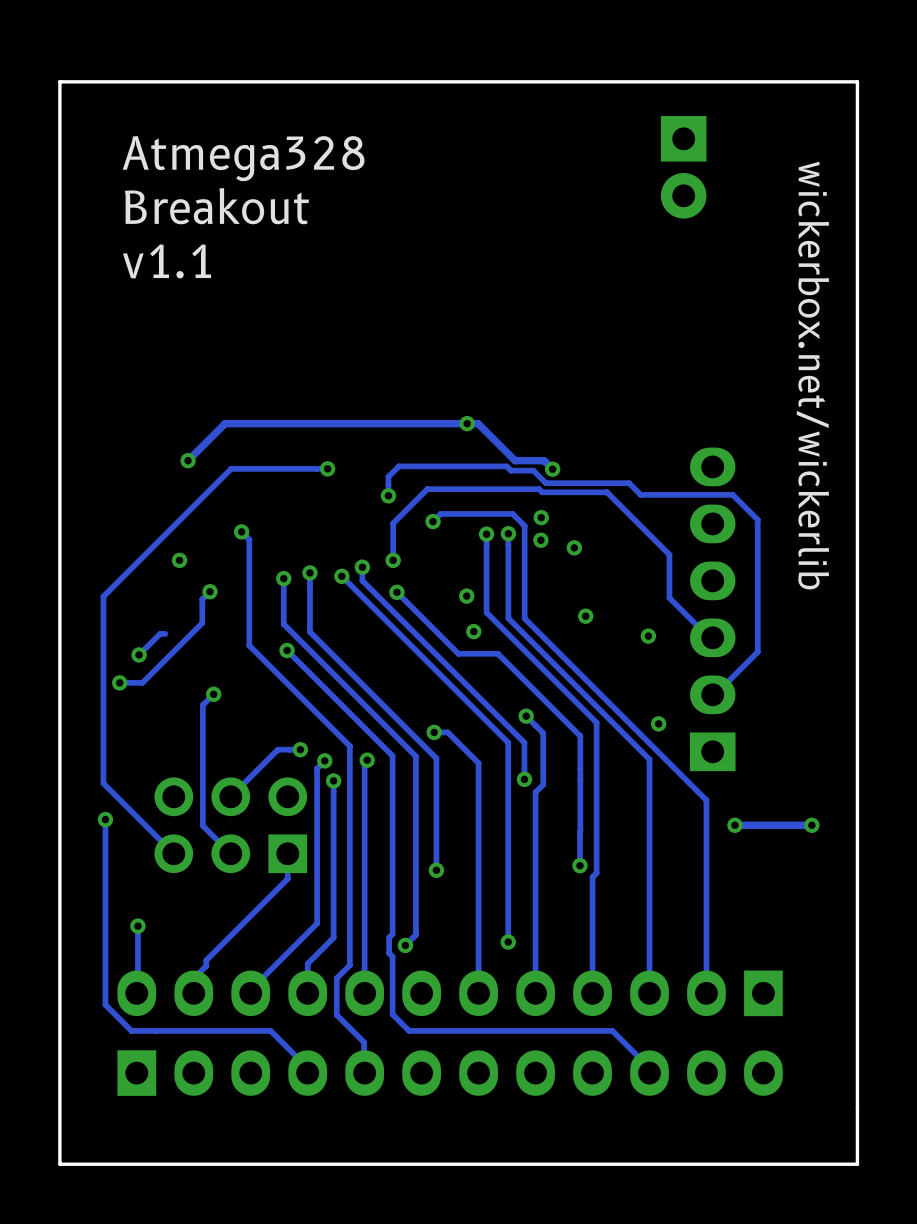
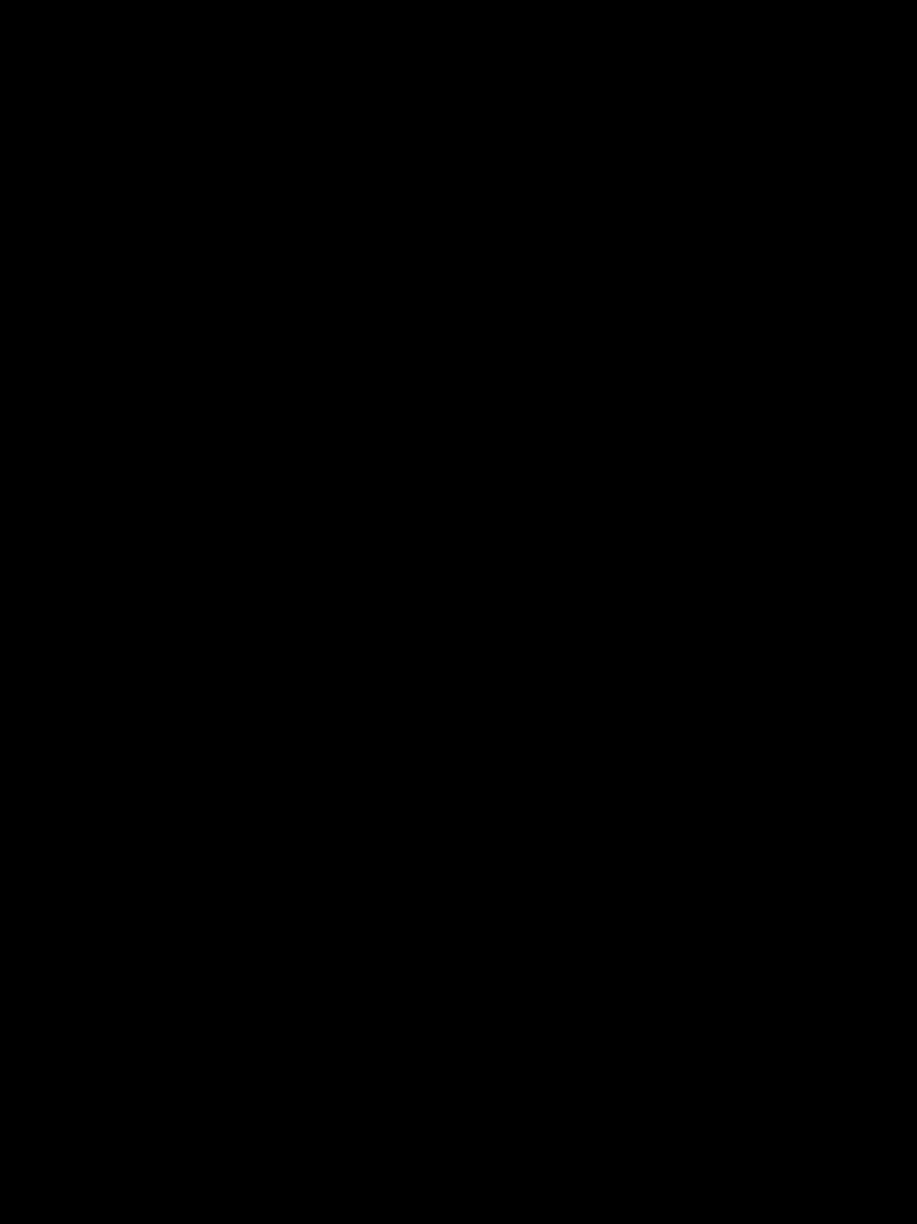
board edge: (857, 81) (857, 1164) (59, 1164) (59, 81) (857, 81) -> none
text: Atmega328 (243, 158) -> none
part: (683, 167) -> none
text: Breakout (216, 206) -> none
text: v1.1 (167, 261) -> none
text: wickerbox.net/wickerlib (812, 375) -> none
via: (467, 423) -> none
track: (188, 460) (225, 423) (478, 423) (515, 460) (544, 460) (552, 469) -> none
via: (188, 460) -> none
track: (327, 468) (231, 468) (103, 596) (103, 783) (173, 853) -> none
via: (327, 468) -> none
via: (552, 469) -> none
track: (388, 495) (388, 476) (398, 466) (506, 466) (510, 470) (533, 470) (545, 483) (629, 483) (640, 494) (732, 494) (757, 519) (757, 652) (715, 694) (712, 694) -> none
via: (388, 495) -> none
via: (541, 517) -> none
track: (433, 521) (440, 513) (512, 513) (524, 525) (524, 618) (706, 800) (706, 993) -> none
via: (433, 521) -> none
track: (241, 531) (249, 539) (249, 645) (349, 746) (349, 965) (336, 978) (336, 1014) (364, 1042) (364, 1070) -> none
via: (241, 531) -> none
track: (508, 533) (508, 618) (649, 759) (649, 993) -> none
via: (508, 533) -> none
track: (486, 534) (486, 612) (596, 722) (596, 873) (592, 877) (592, 993) -> none
via: (486, 534) -> none
via: (540, 540) -> none
via: (574, 547) -> none
via: (179, 560) -> none
track: (393, 560) (393, 523) (427, 489) (539, 489) (542, 492) (607, 492) (669, 554) (669, 597) (709, 637) (712, 637) -> none
via: (393, 560) -> none
track: (362, 567) (362, 580) (524, 742) (524, 779) -> none
via: (362, 567) -> none
track: (309, 572) (309, 631) (436, 758) (436, 870) -> none
via: (309, 572) -> none
track: (341, 576) (508, 742) (508, 942) -> none
via: (341, 576) -> none
track: (283, 578) (283, 624) (415, 756) (415, 934) (405, 945) -> none
via: (283, 578) -> none
track: (209, 591) (202, 599) (202, 623) (142, 682) (119, 682) -> none
via: (209, 591) -> none
track: (396, 592) (458, 653) (497, 653) (580, 736) (580, 865) -> none
via: (396, 592) -> none
via: (466, 596) -> none
part: (712, 609) -> none
via: (585, 616) -> none
via: (473, 631) -> none
track: (165, 633) (160, 633) (139, 654) -> none
via: (648, 636) -> none
track: (287, 650) (392, 755) (392, 934) (389, 937) (389, 953) (392, 956) (392, 1014) (409, 1030) (612, 1030) (648, 1067) (648, 1070) -> none
via: (287, 650) -> none
via: (139, 654) -> none
via: (119, 682) -> none
track: (213, 694) (202, 705) (202, 825) (230, 853) -> none
via: (213, 694) -> none
track: (526, 716) (543, 733) (543, 784) (535, 792) (535, 993) -> none
via: (526, 716) -> none
via: (658, 723) -> none
track: (434, 732) (447, 732) (478, 763) (478, 993) -> none
via: (434, 732) -> none
track: (300, 749) (277, 749) (230, 796) -> none
via: (300, 749) -> none
track: (324, 760) (317, 768) (317, 923) (250, 989) (250, 993) -> none
via: (324, 760) -> none
track: (367, 760) (364, 762) (364, 993) -> none
via: (367, 760) -> none
via: (524, 779) -> none
track: (333, 780) (333, 937) (307, 963) (307, 993) -> none
via: (333, 780) -> none
track: (105, 819) (105, 1004) (131, 1030) (270, 1030) (307, 1067) (307, 1070) -> none
via: (105, 819) -> none
part: (230, 825) -> none
via: (734, 825) -> none
track: (811, 825) (734, 825) -> none
via: (811, 825) -> none
track: (287, 853) (287, 878) (206, 960) (206, 965) (193, 978) (193, 993) -> none
via: (580, 865) -> none
via: (436, 870) -> none
track: (137, 926) (137, 1012) -> none
via: (137, 926) -> none
via: (508, 942) -> none
via: (405, 945) -> none
part: (450, 993) -> none
part: (450, 1073) -> none

